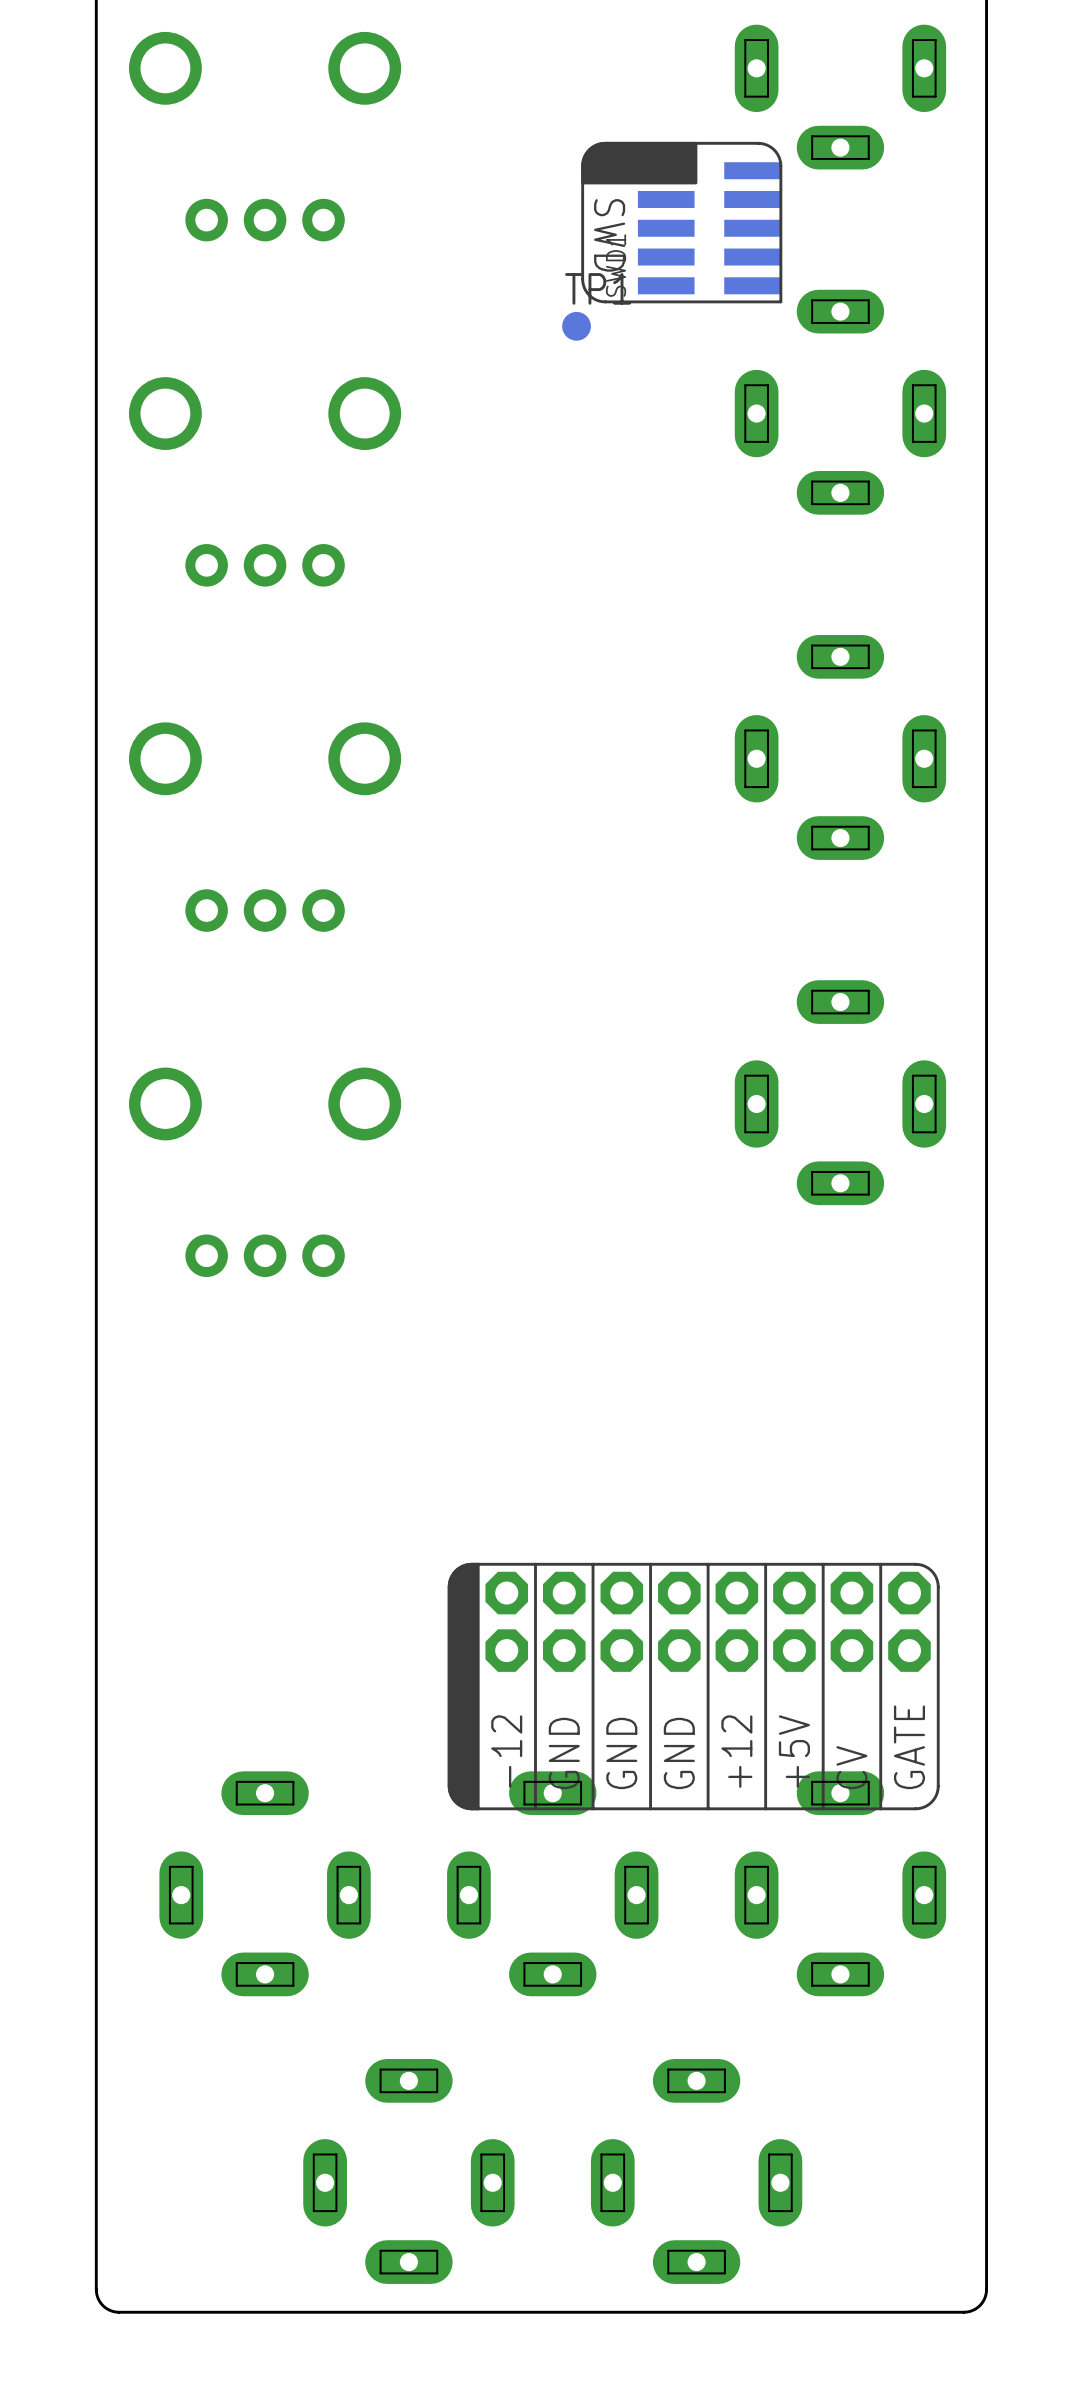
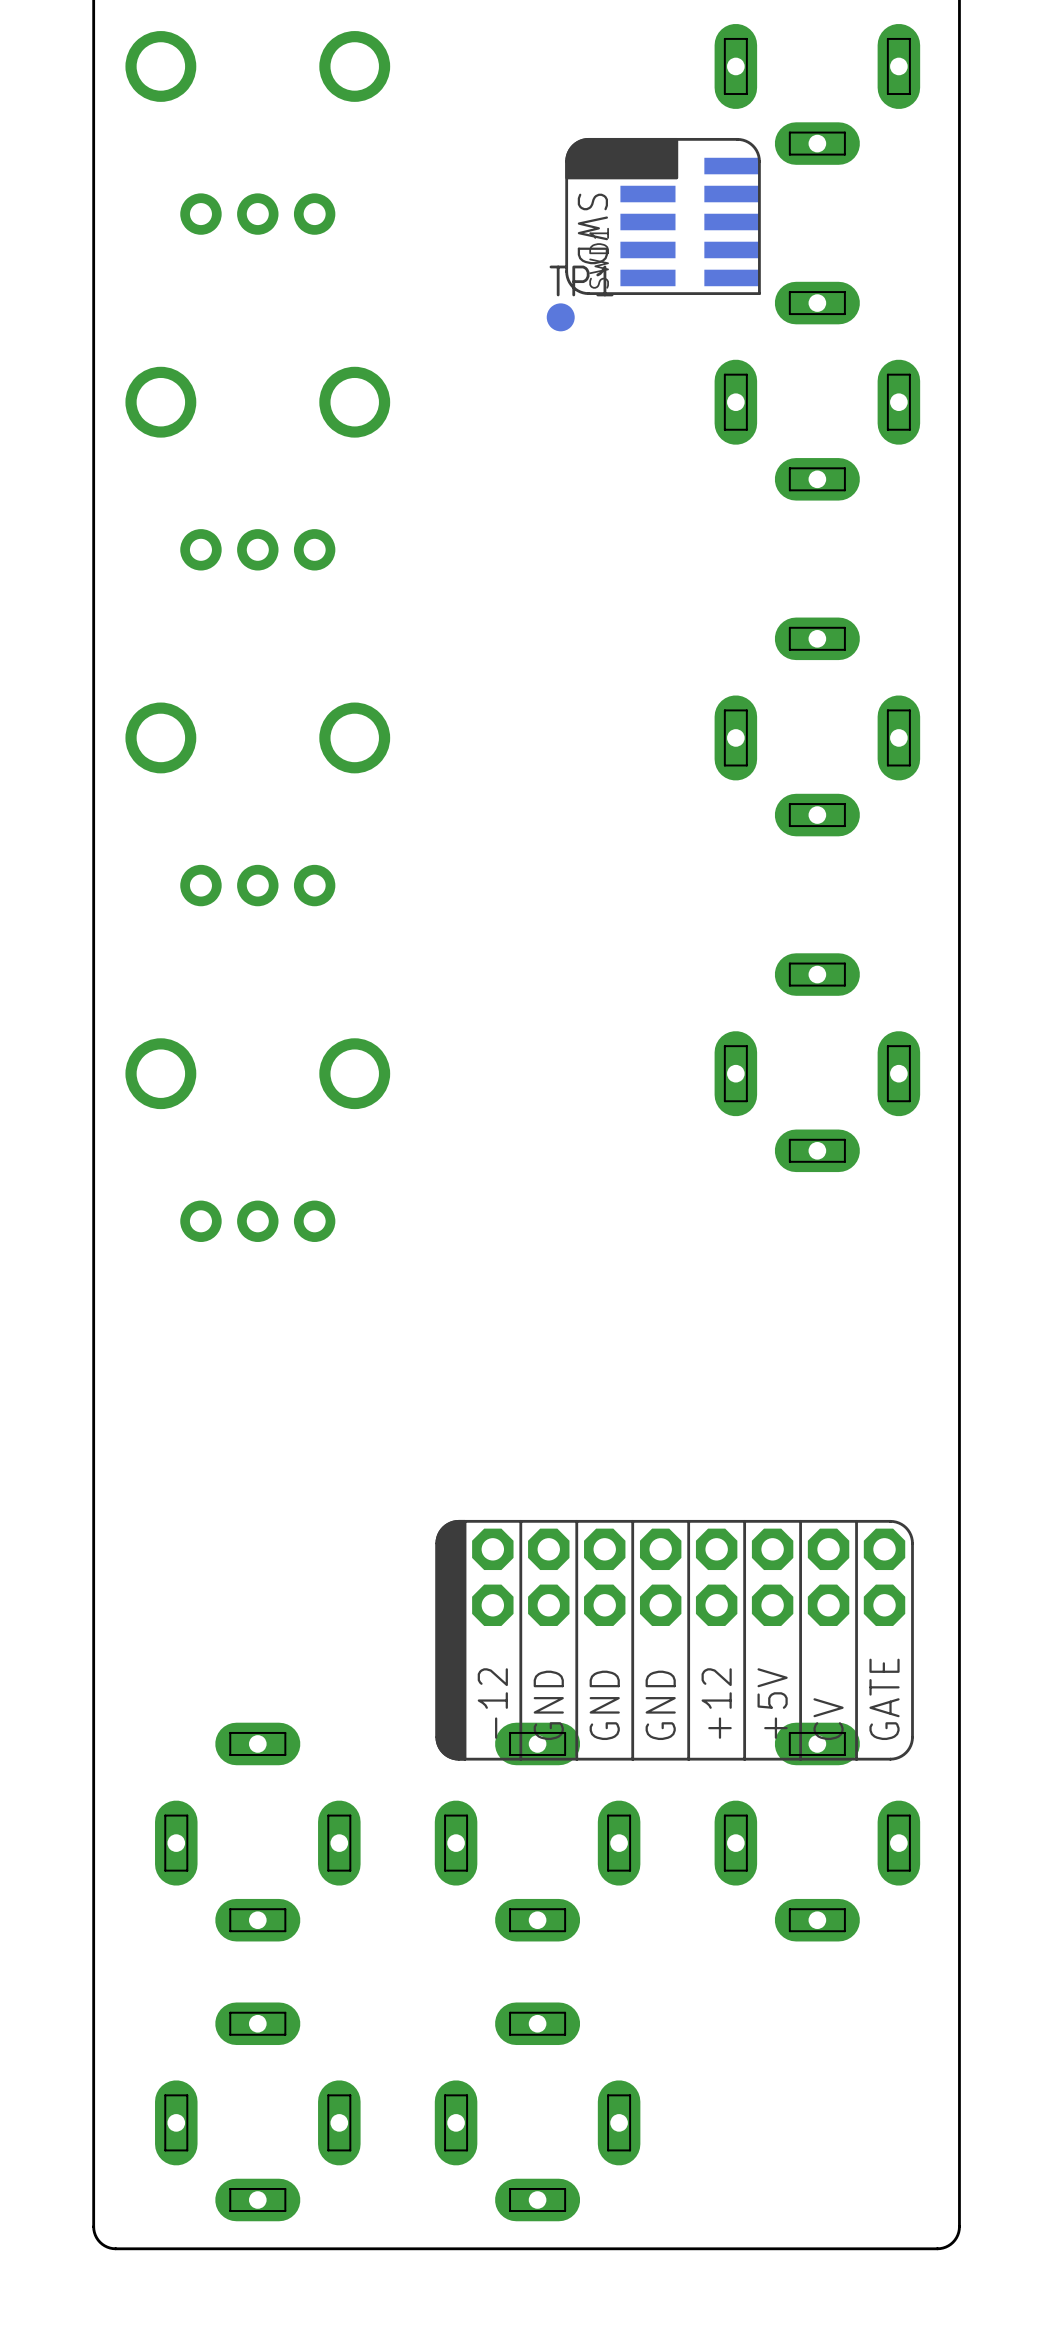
part: none -> (257, 2111)
part: (408, 2171) -> none
part: none -> (537, 2111)
part: (696, 2171) -> none

